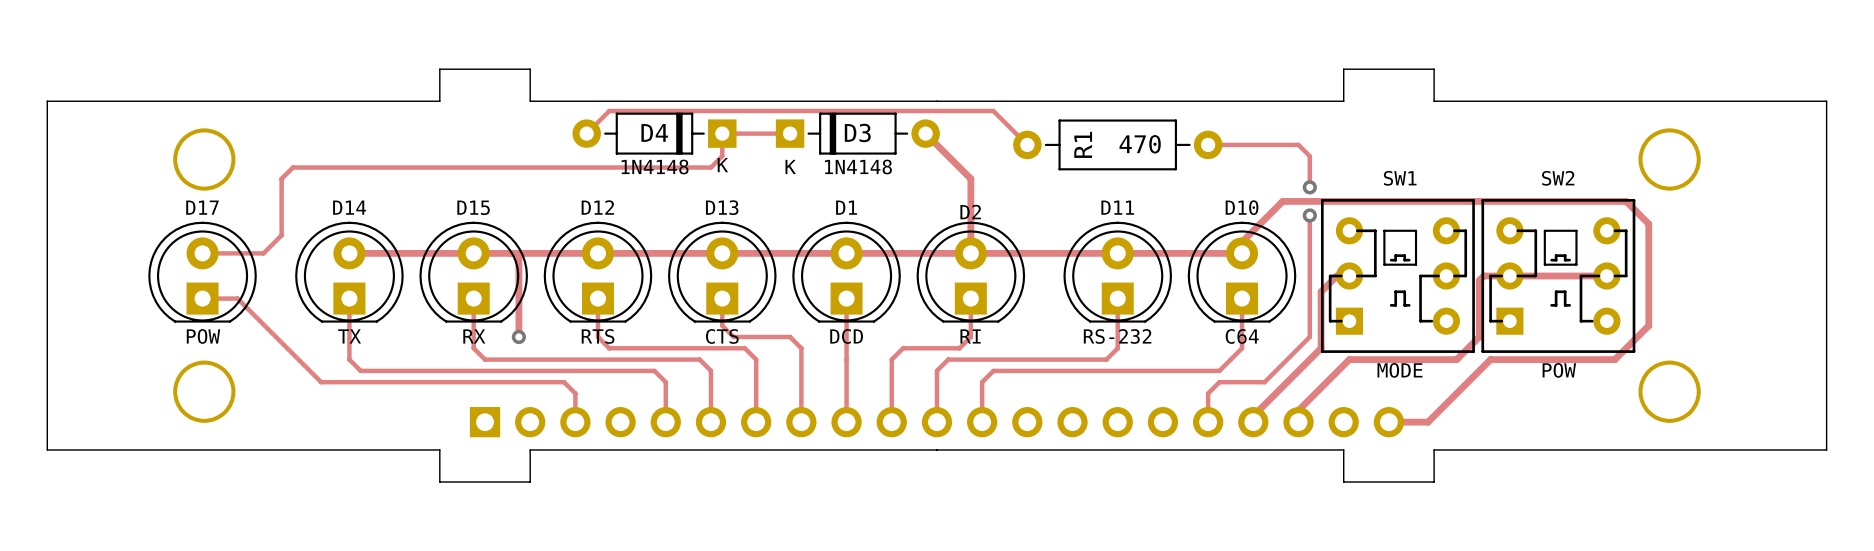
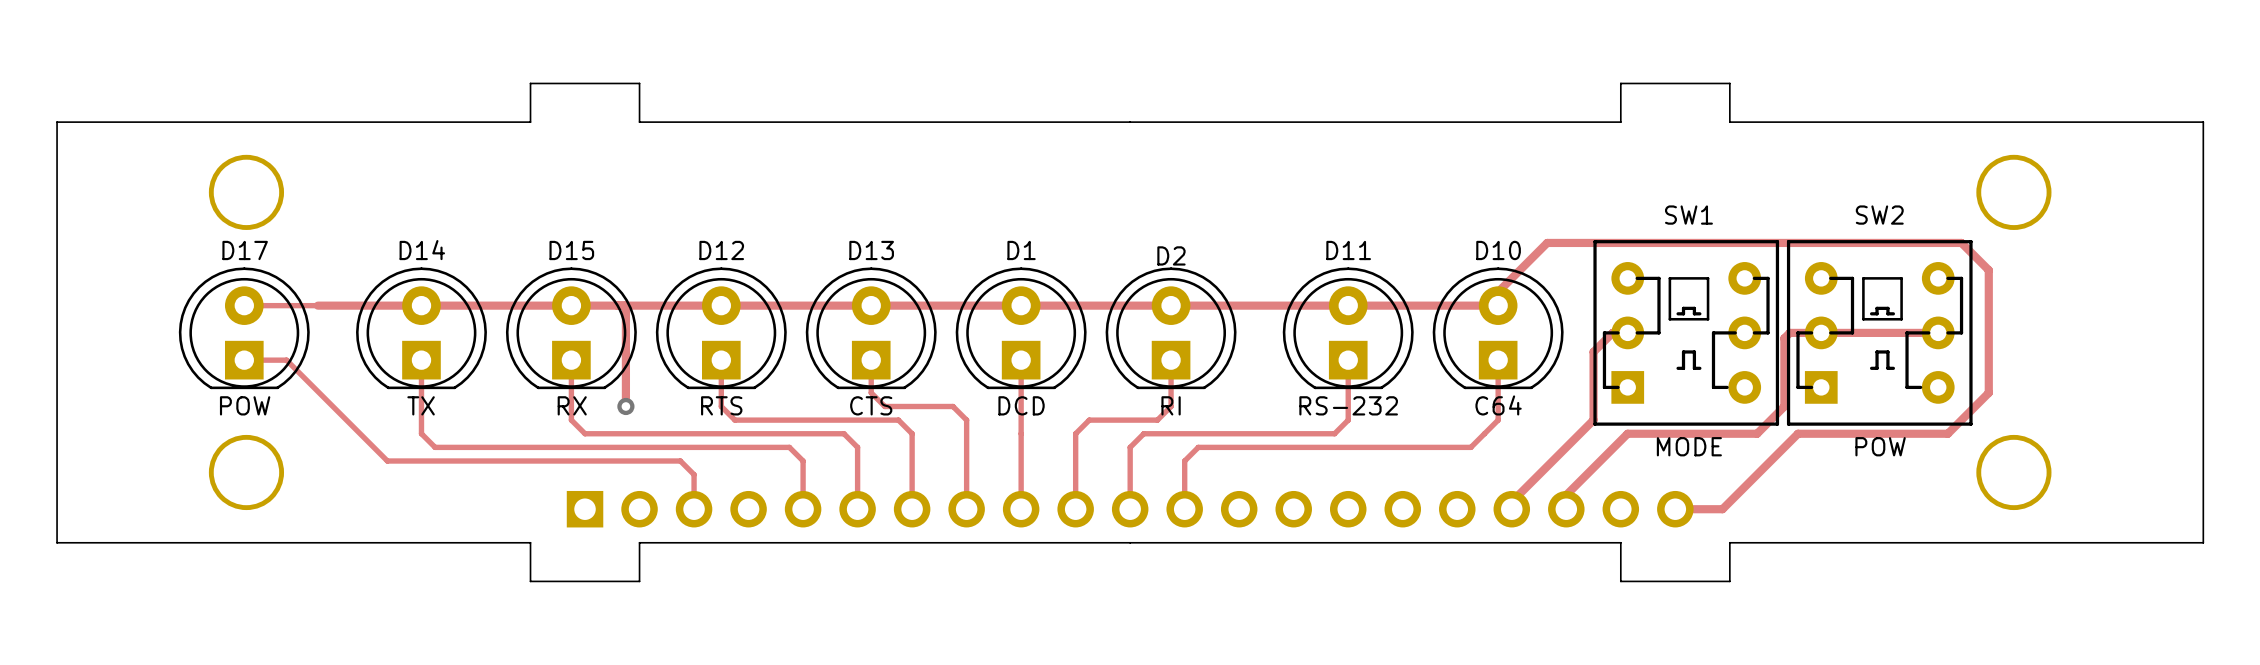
track: (586, 133) (609, 111) (993, 111) (1027, 144) -> none
D4: 1N4148 (654, 133) -> none
track: (790, 133) (722, 133) (722, 156) (710, 167) (292, 167) (281, 178) (281, 235) (263, 253) -> (421, 305) (317, 305)
D3: 1N4148 (857, 133) -> none
track: (925, 133) (970, 178) (970, 253) -> none
R1: 470 (1117, 144) -> none
track: (1208, 144) (1298, 144) (1309, 156) (1309, 187) -> none
via: (1309, 187) -> none
track: (1309, 215) (1309, 336) (1264, 382) (1219, 382) (1208, 393) (1208, 422) -> none
via: (1309, 215) -> none

